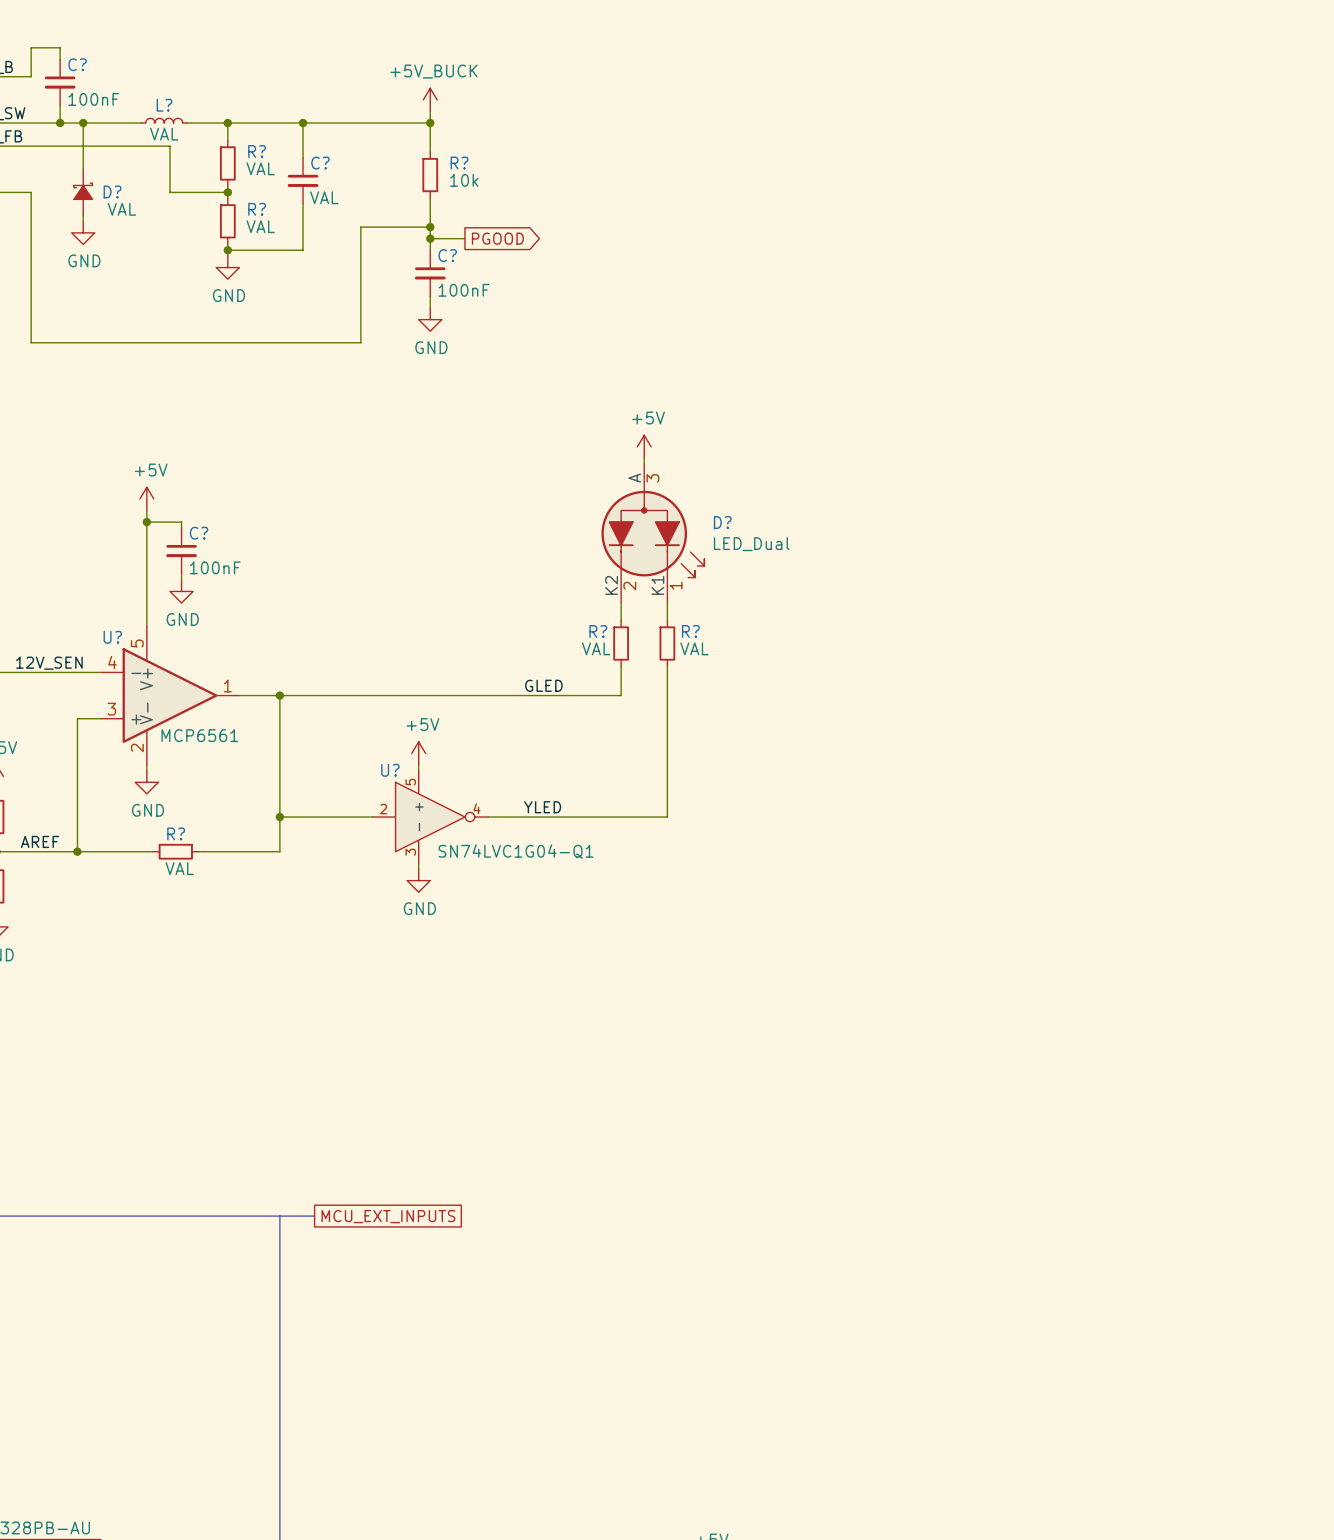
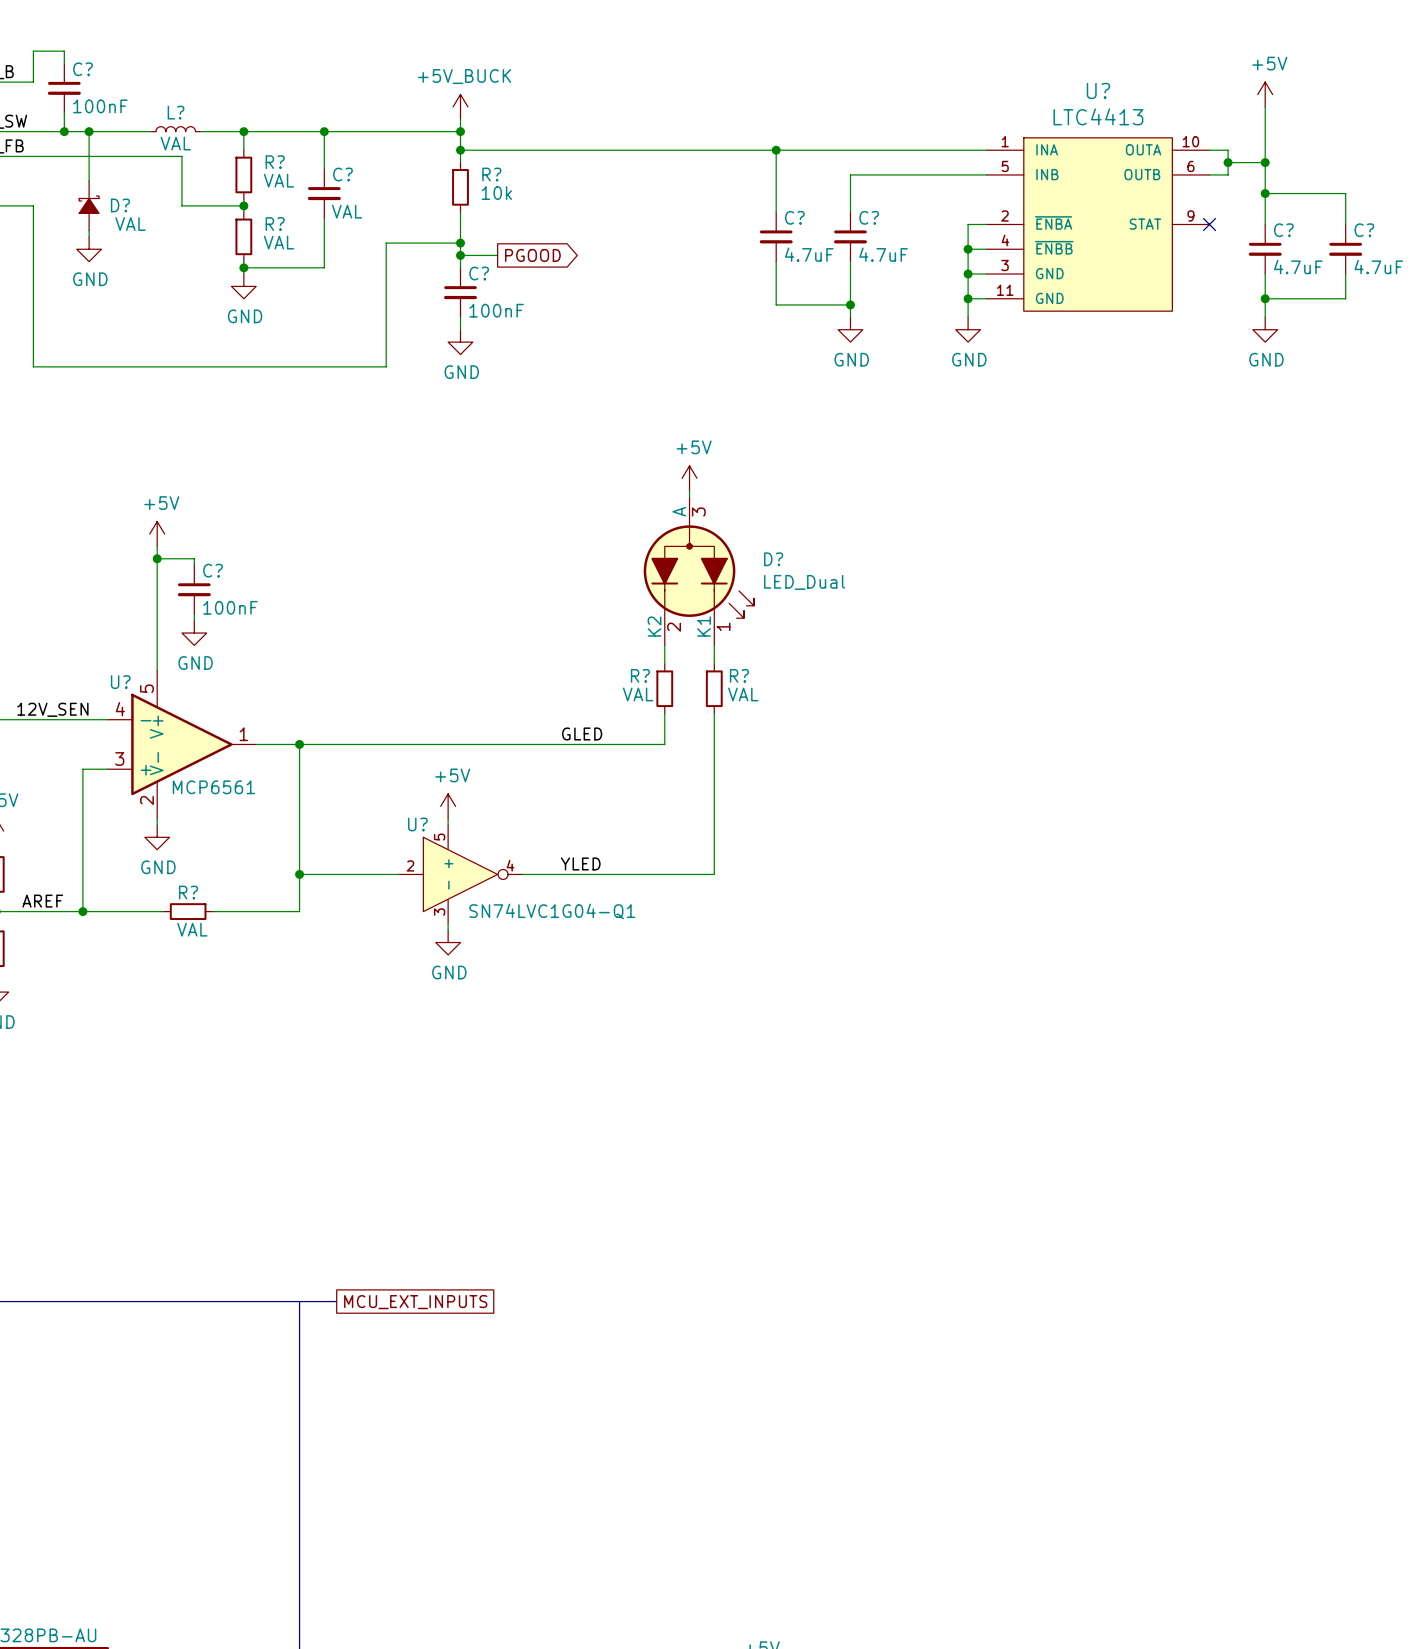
power symbol: none -> +5V (1265, 94)
wire: none -> (1265, 106) (1265, 224)
wire: none -> (460, 150) (986, 150)
junction: none -> (460, 150)
wire: none -> (776, 150) (776, 212)
junction: none -> (776, 150)
wire: none -> (1209, 150) (1228, 150) (1228, 174) (1209, 174)
wire: none -> (1228, 162) (1265, 162)
junction: none -> (1228, 162)
junction: none -> (1265, 162)
wire: none -> (986, 174) (850, 174) (850, 212)
wire: none -> (1265, 193) (1345, 193) (1345, 224)
junction: none -> (1265, 193)
wire: none -> (986, 224) (968, 224) (968, 317)
U?: none -> LTC4413 (1098, 224)
no-connect mark: none -> (1209, 224)
C?: none -> 4.7uF (776, 236)
C?: none -> 4.7uF (850, 236)
wire: none -> (968, 249) (986, 249)
junction: none -> (968, 249)
C?: none -> 4.7uF (1265, 249)
C?: none -> 4.7uF (1345, 249)
wire: none -> (776, 261) (776, 304) (850, 304)
wire: none -> (850, 261) (850, 317)
wire: none -> (968, 274) (986, 274)
junction: none -> (968, 274)
wire: none -> (1265, 274) (1265, 317)
wire: none -> (1345, 274) (1345, 298) (1265, 298)
wire: none -> (968, 298) (986, 298)
junction: none -> (968, 298)
junction: none -> (1265, 298)
junction: none -> (850, 304)
power symbol: none -> GND (850, 329)
power symbol: none -> GND (968, 329)
power symbol: none -> GND (1265, 329)

